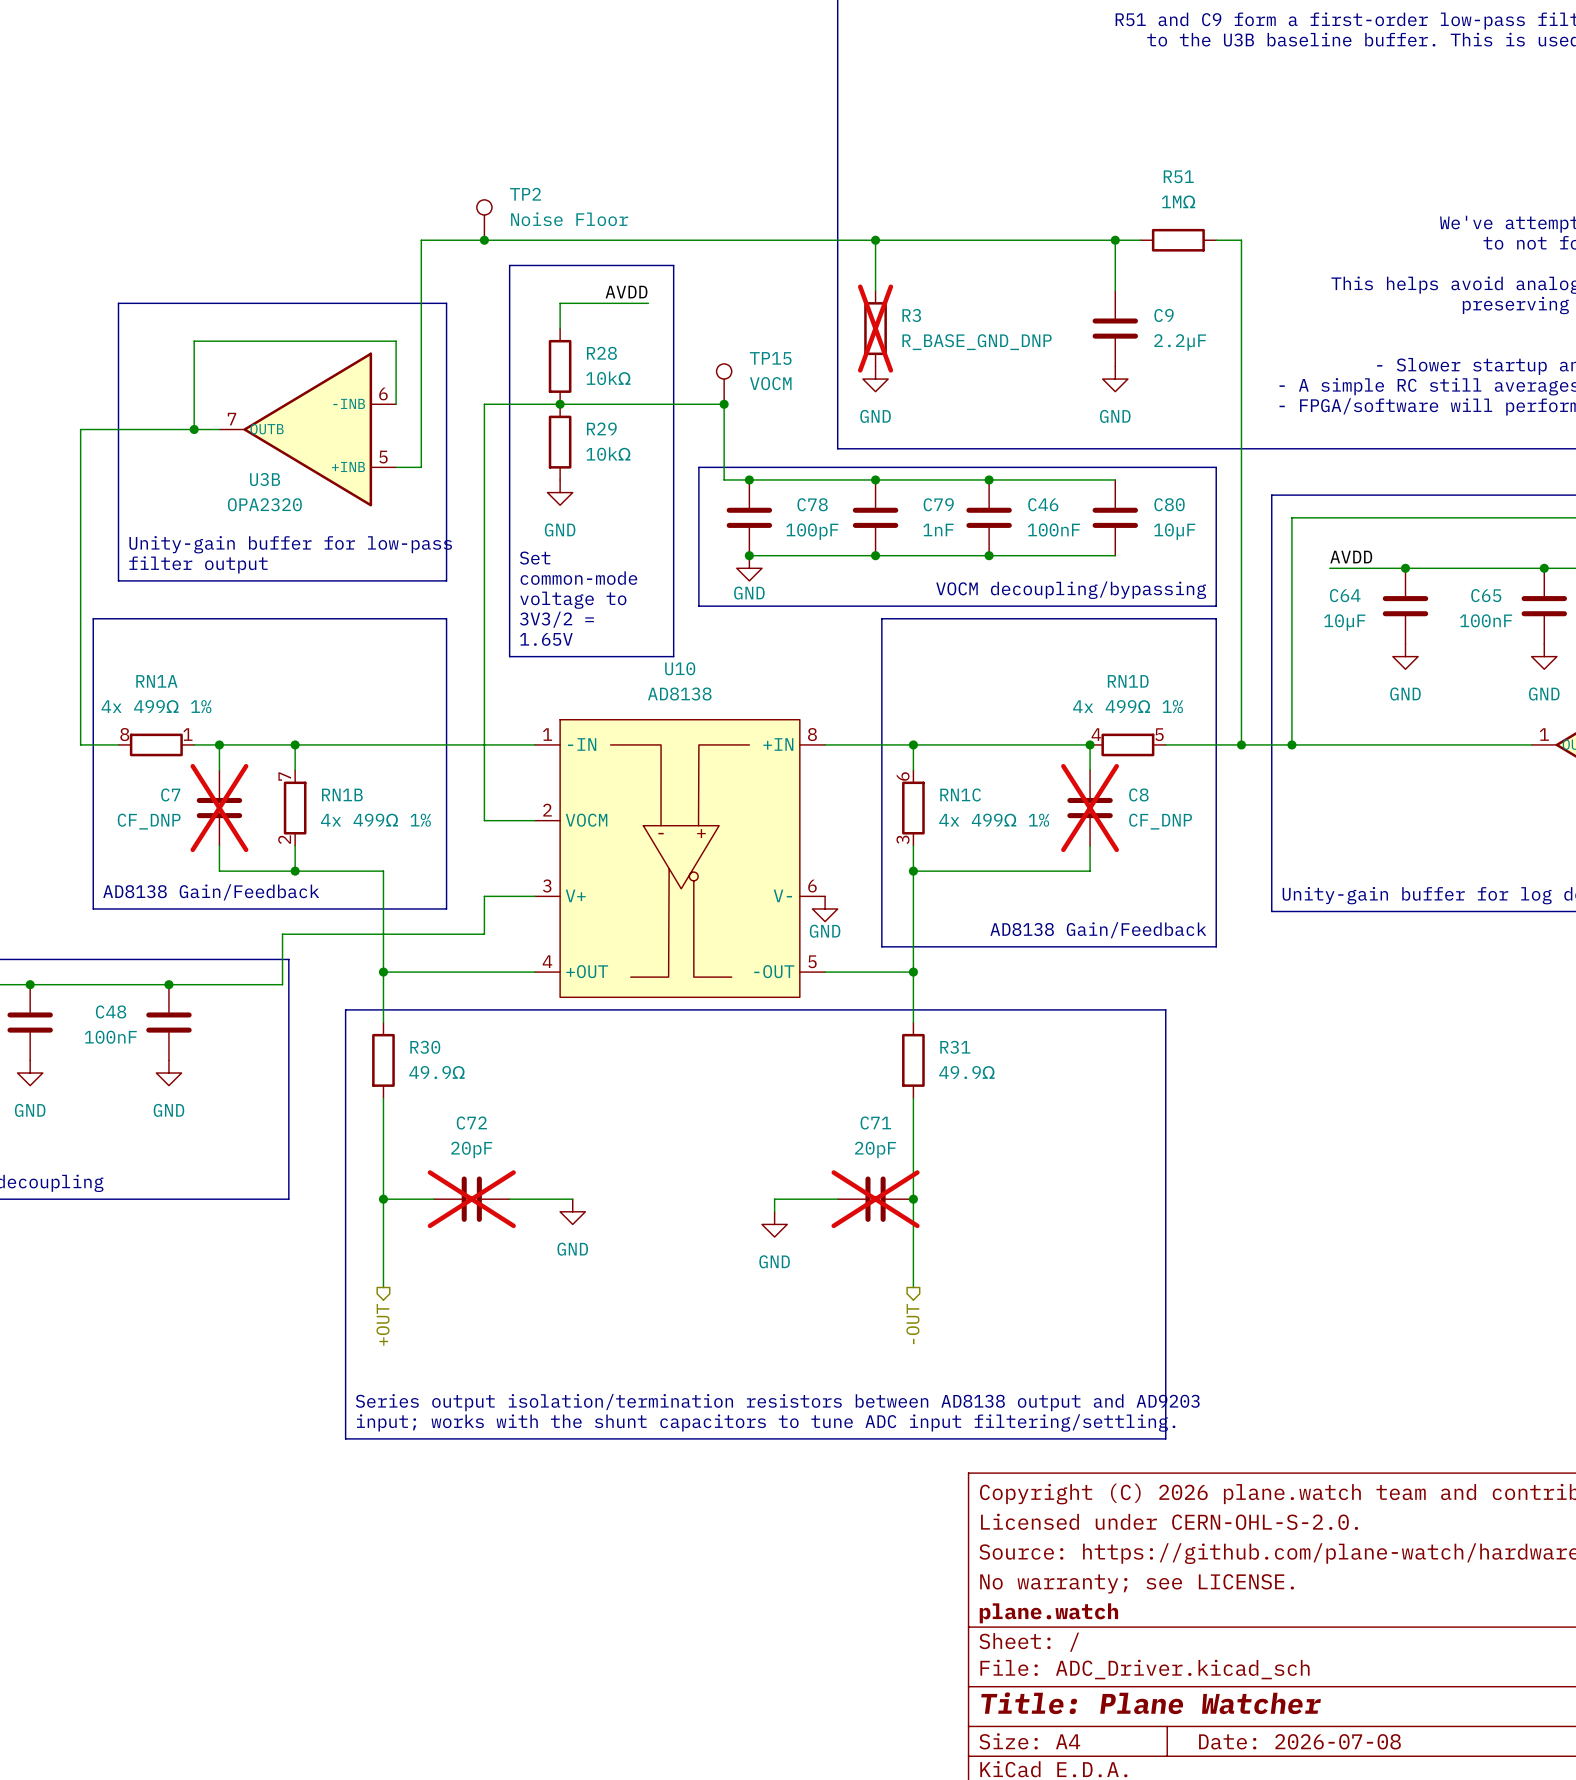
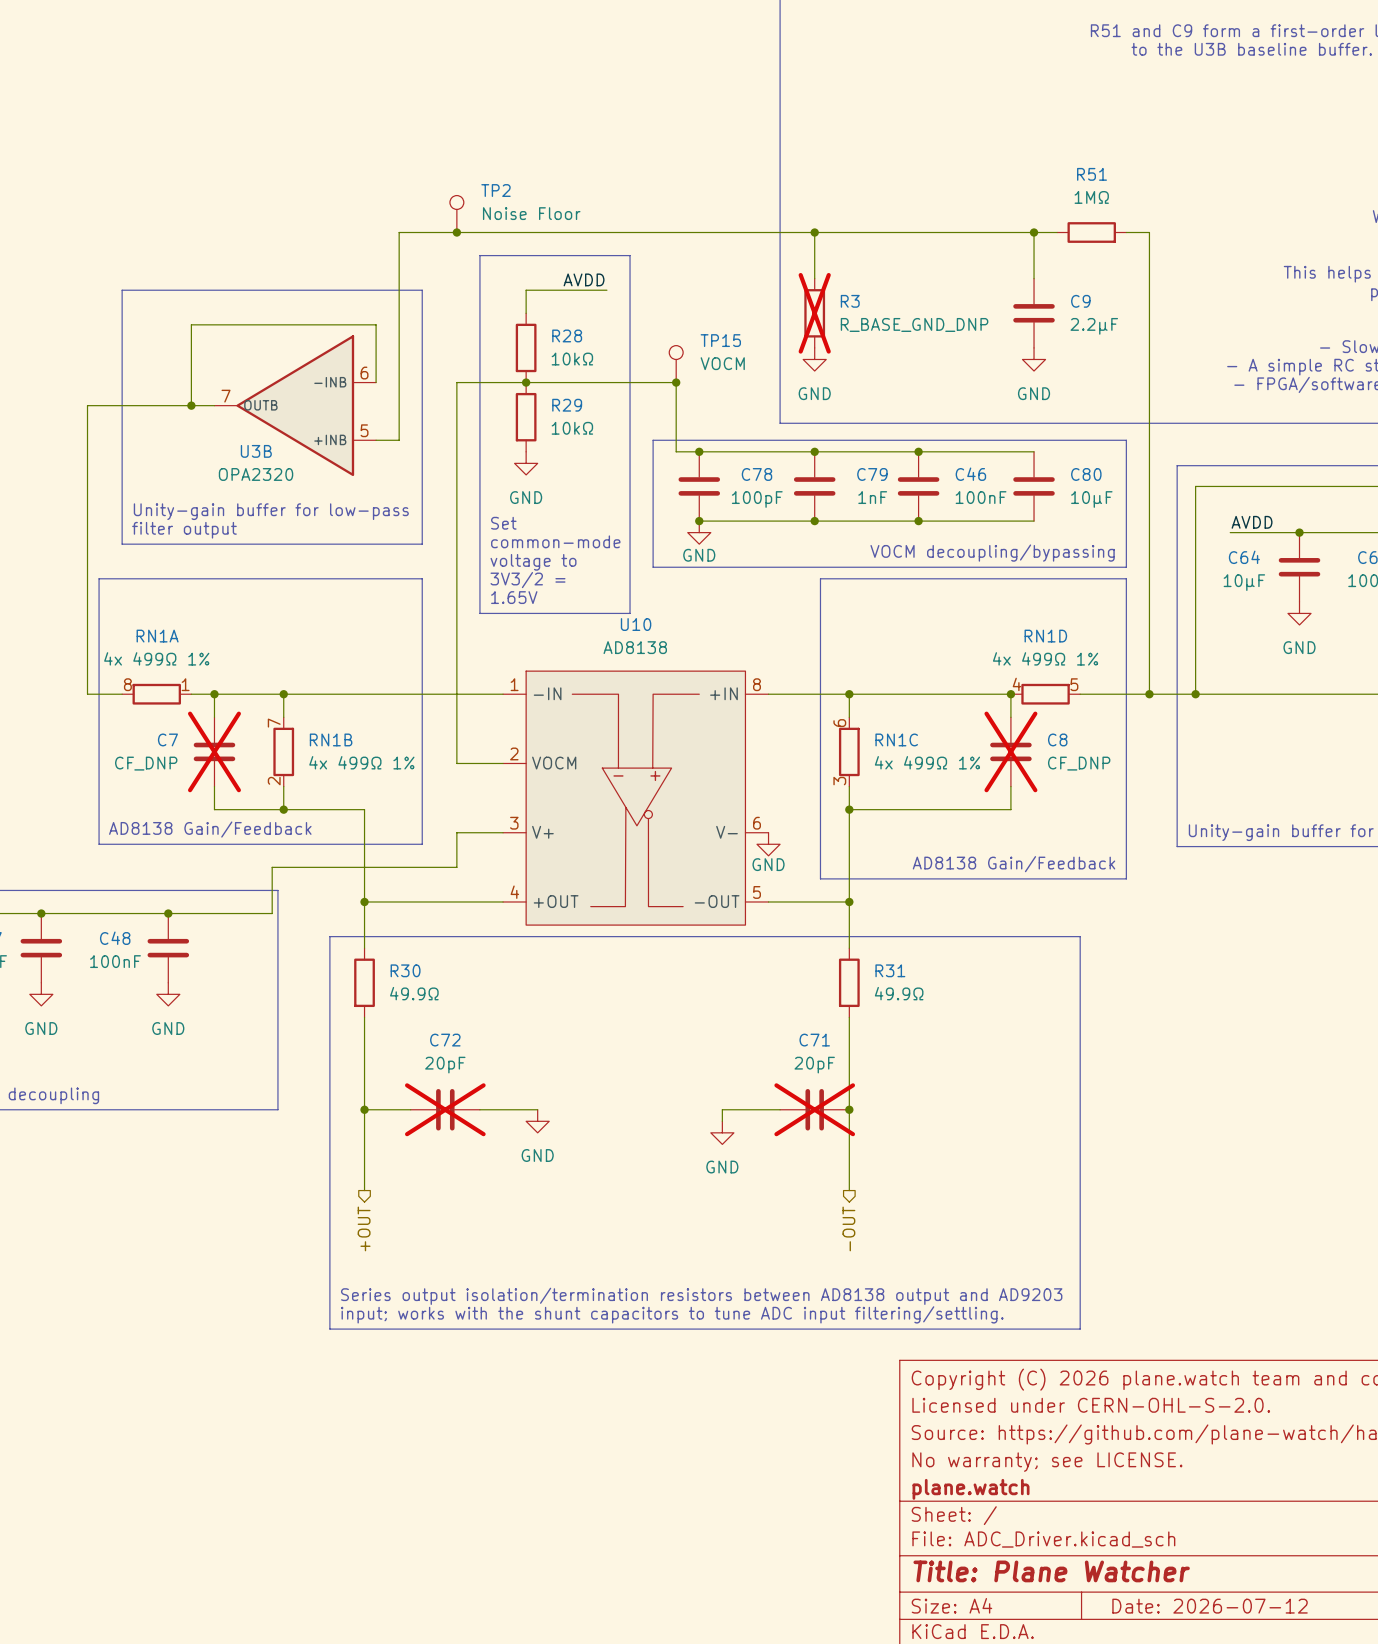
title block: Date: 2026-07-08 (1299, 1741) -> Date: 2026-07-12 (1210, 1606)

